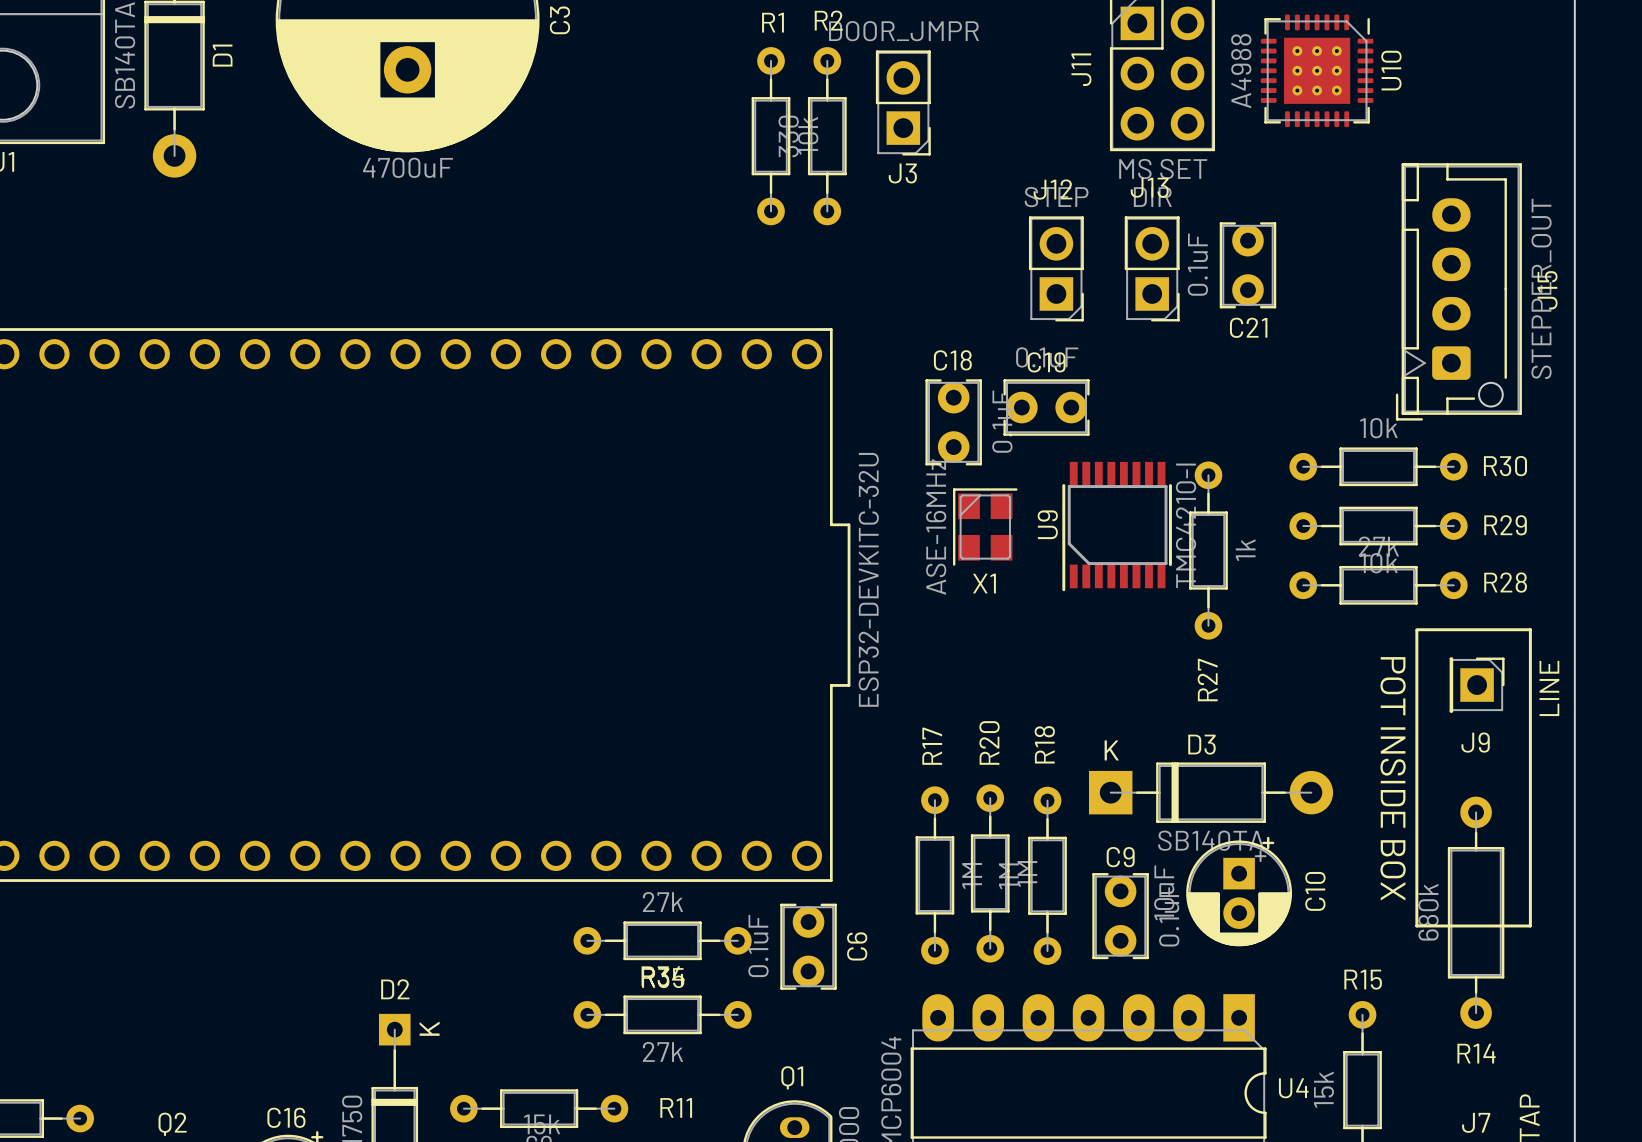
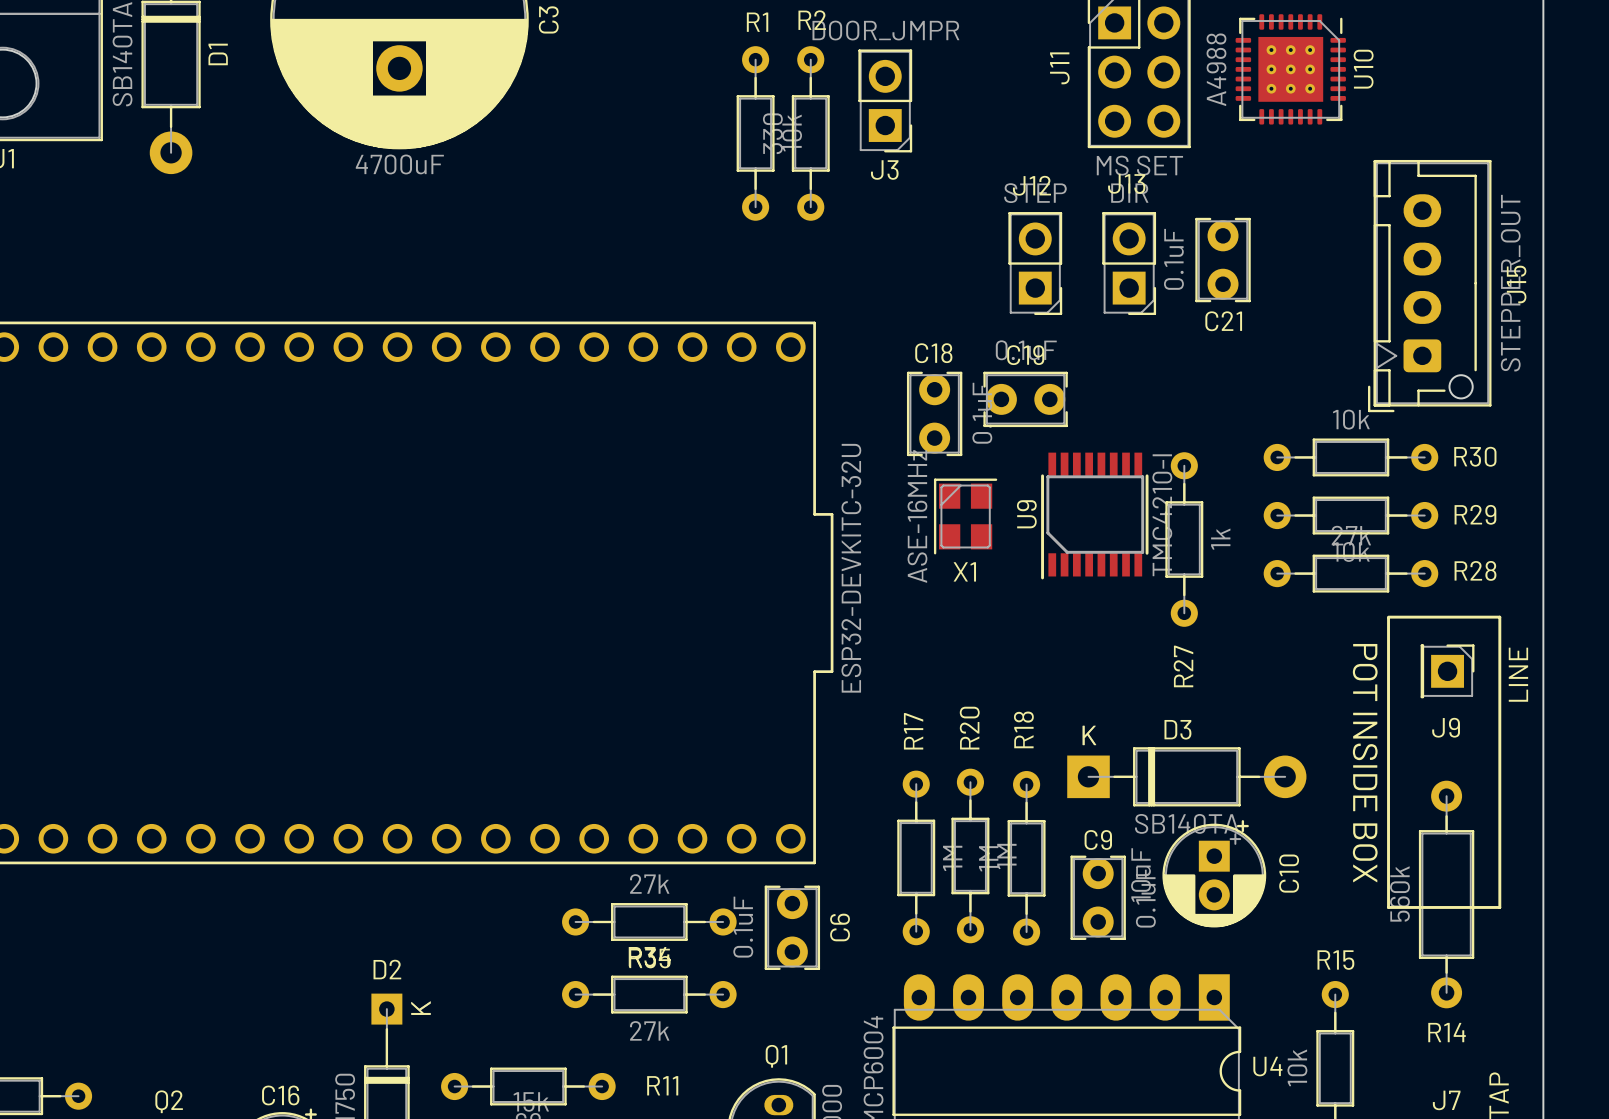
R14 value: 680k (1428, 912) -> 560k (1400, 894)
R15 value: 15k (1323, 1089) -> 10k (1297, 1067)

